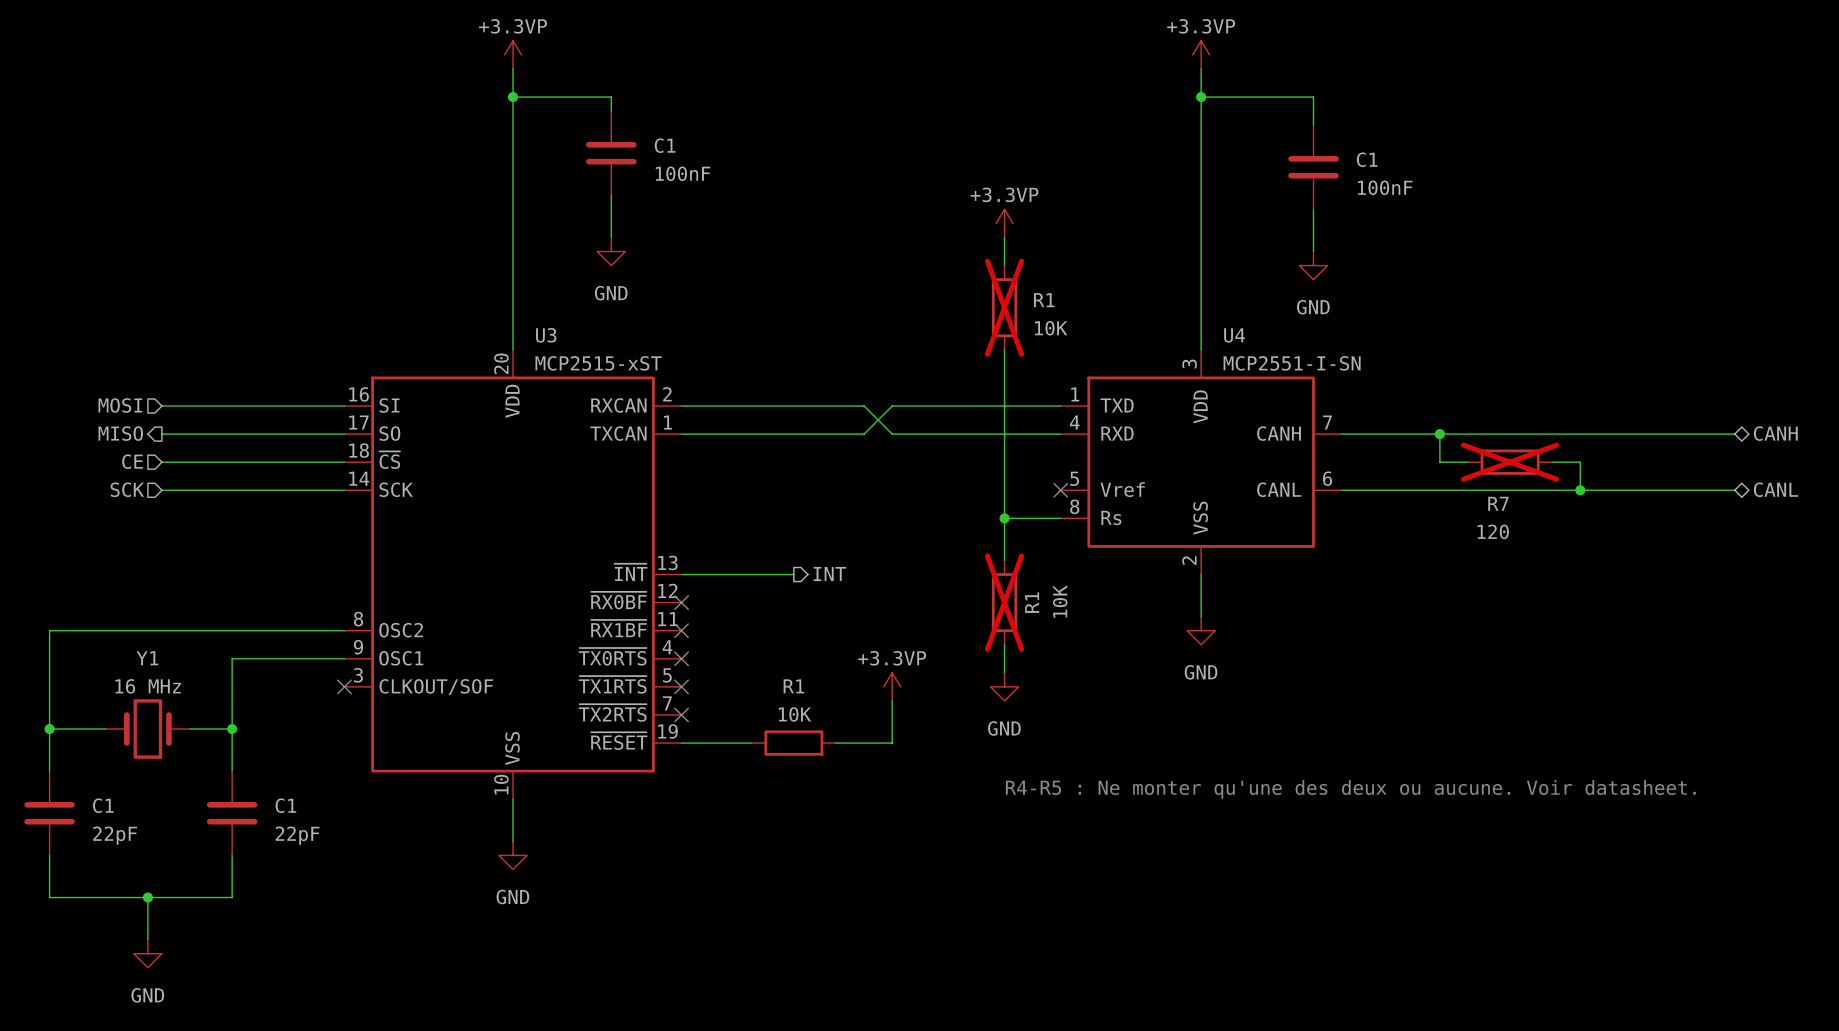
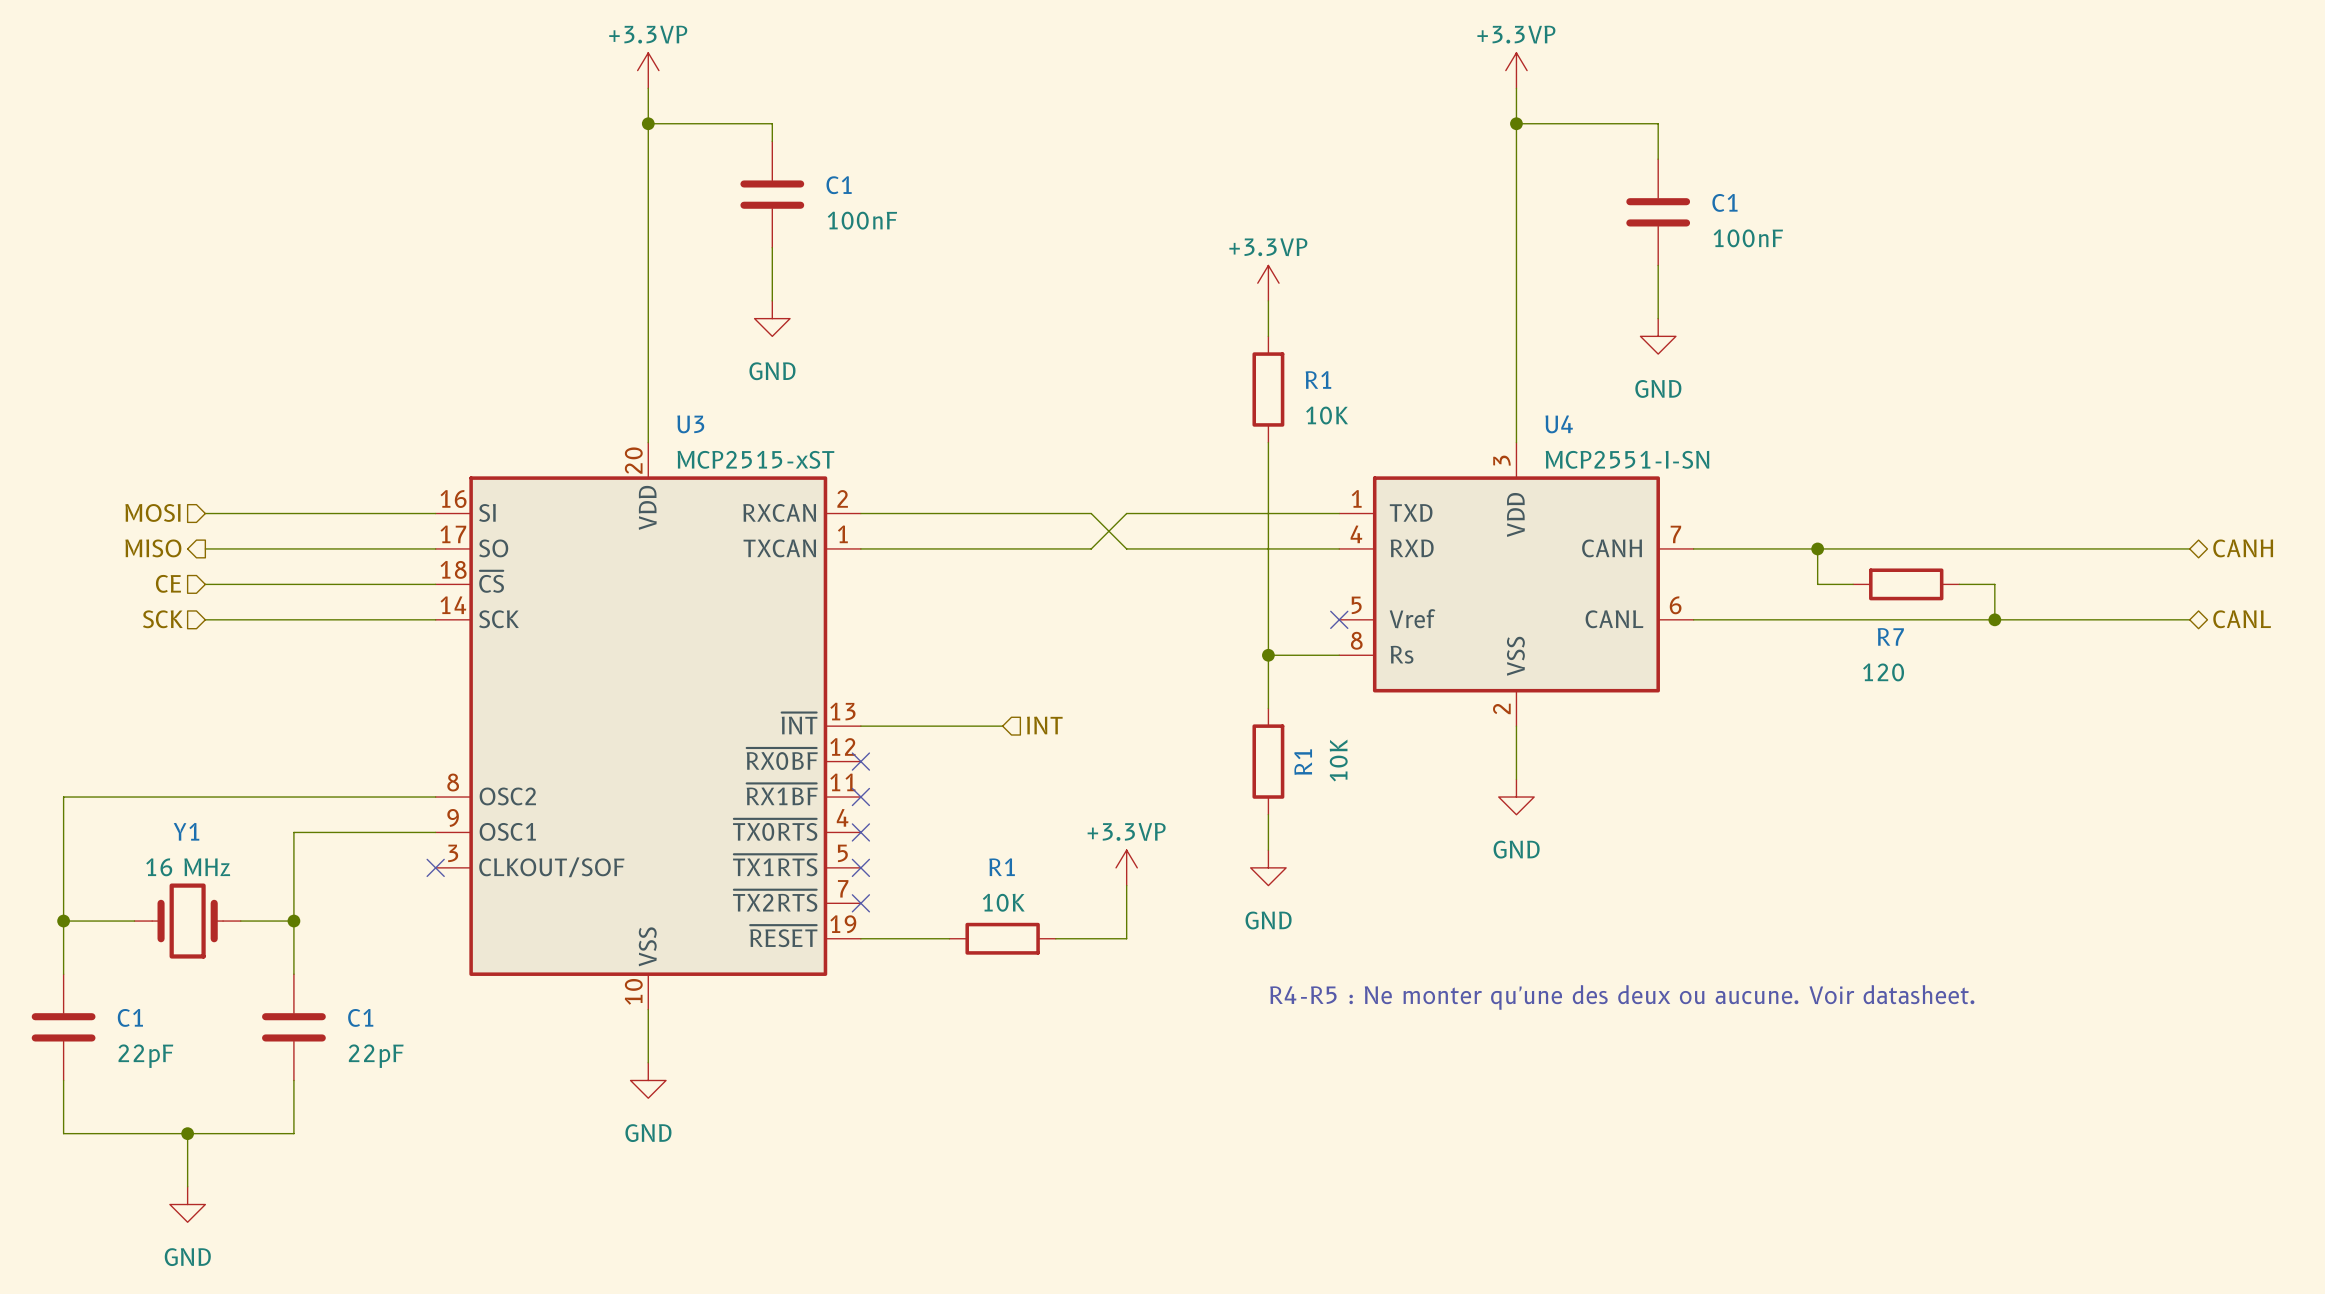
R1 do-not-place cross: (1004, 307) -> none
R7 do-not-place cross: (1510, 462) -> none
hierarchical label shape: output (829, 574) -> input (1044, 725)
R1 do-not-place cross: (1004, 602) -> none

